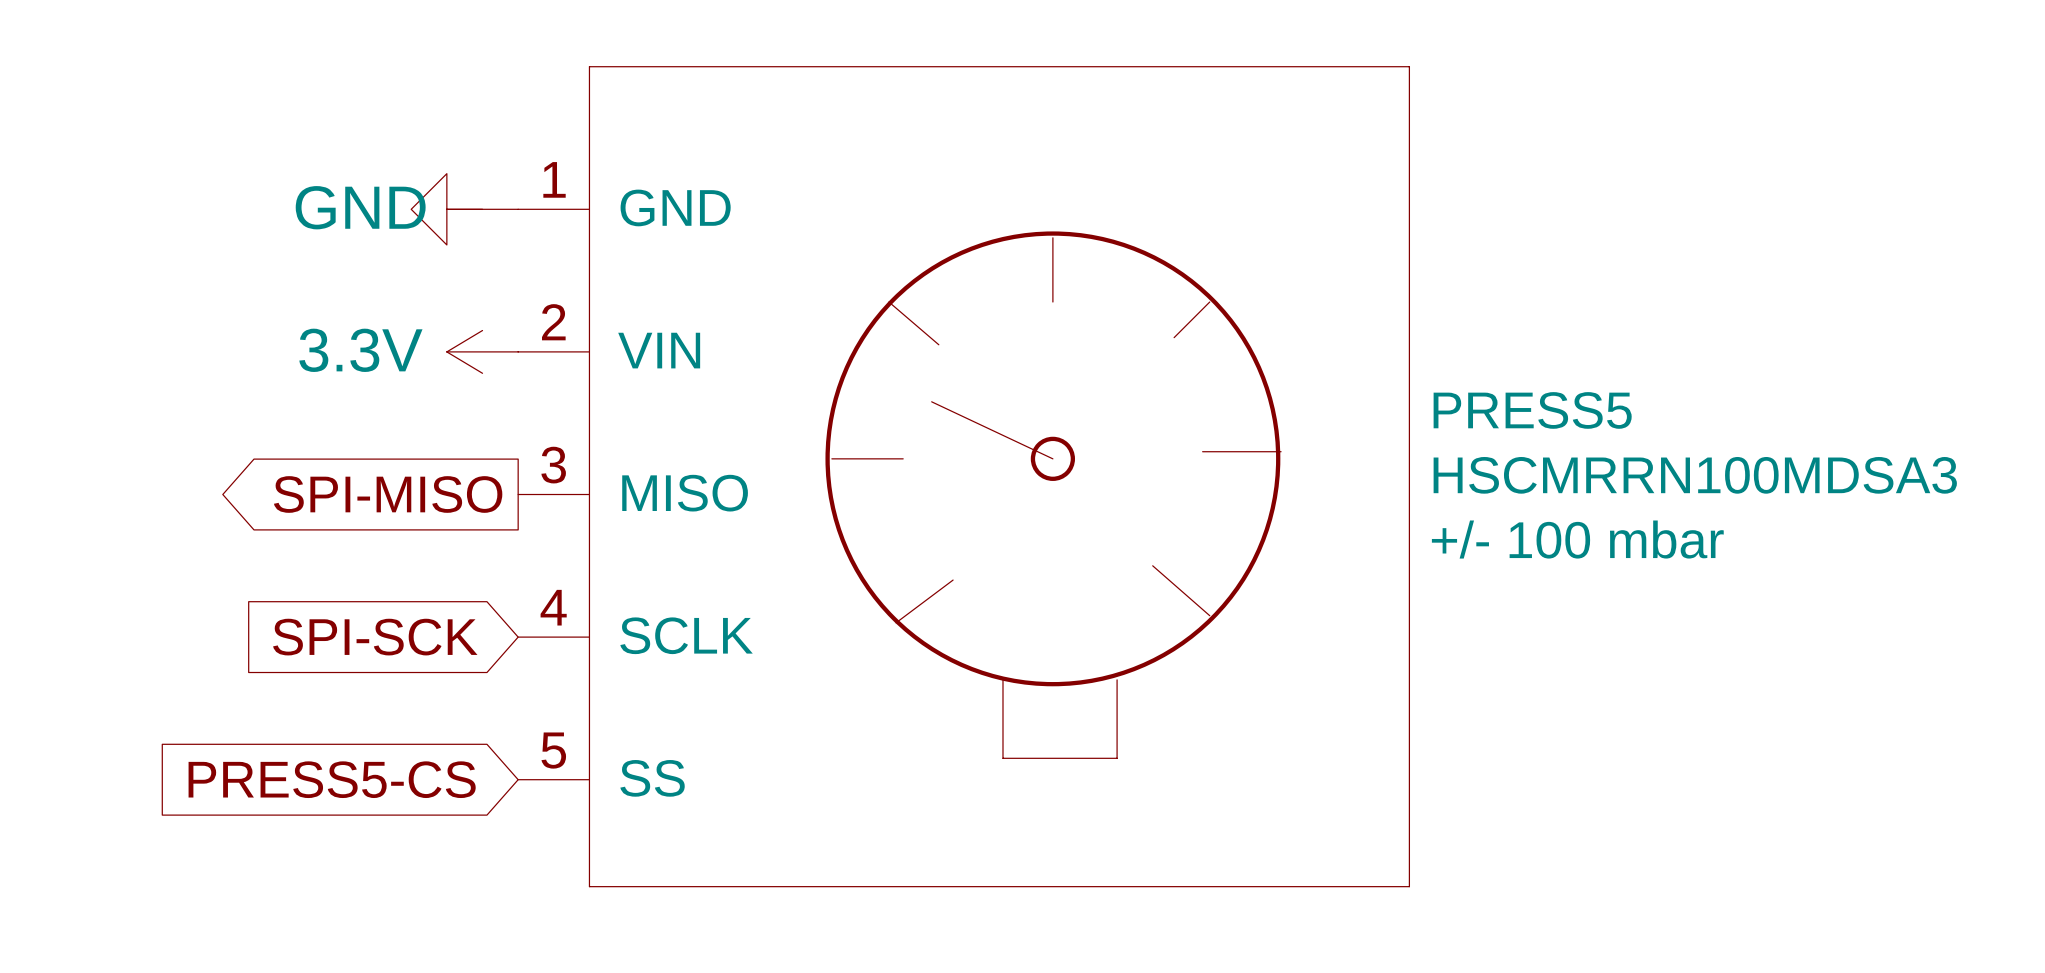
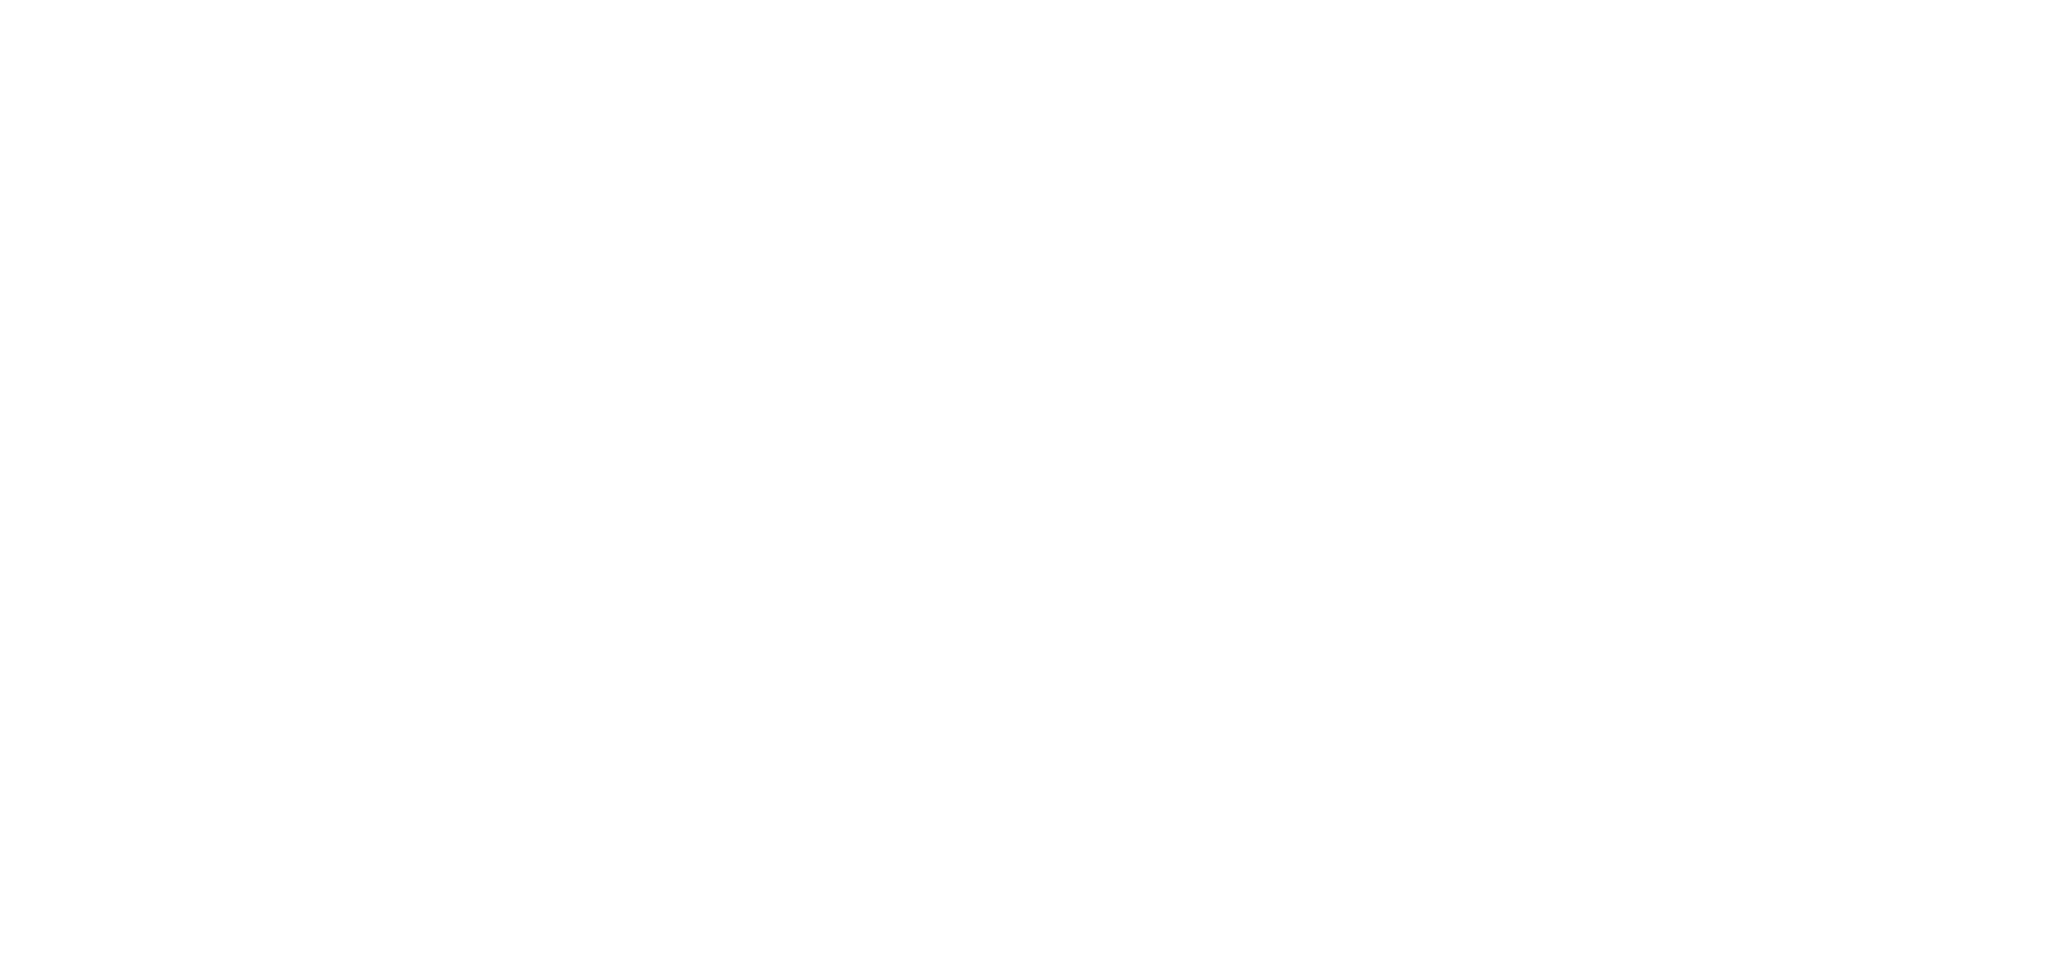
power symbol: GND (464, 209) -> none
power symbol: 3.3V (482, 351) -> none
PRESS5: HSCMRRN100MDSA3 (963, 476) -> none
global label: SPI-MISO (388, 494) -> none
global label: SPI-SCK (375, 637) -> none
global label: PRESS5-CS (332, 779) -> none

